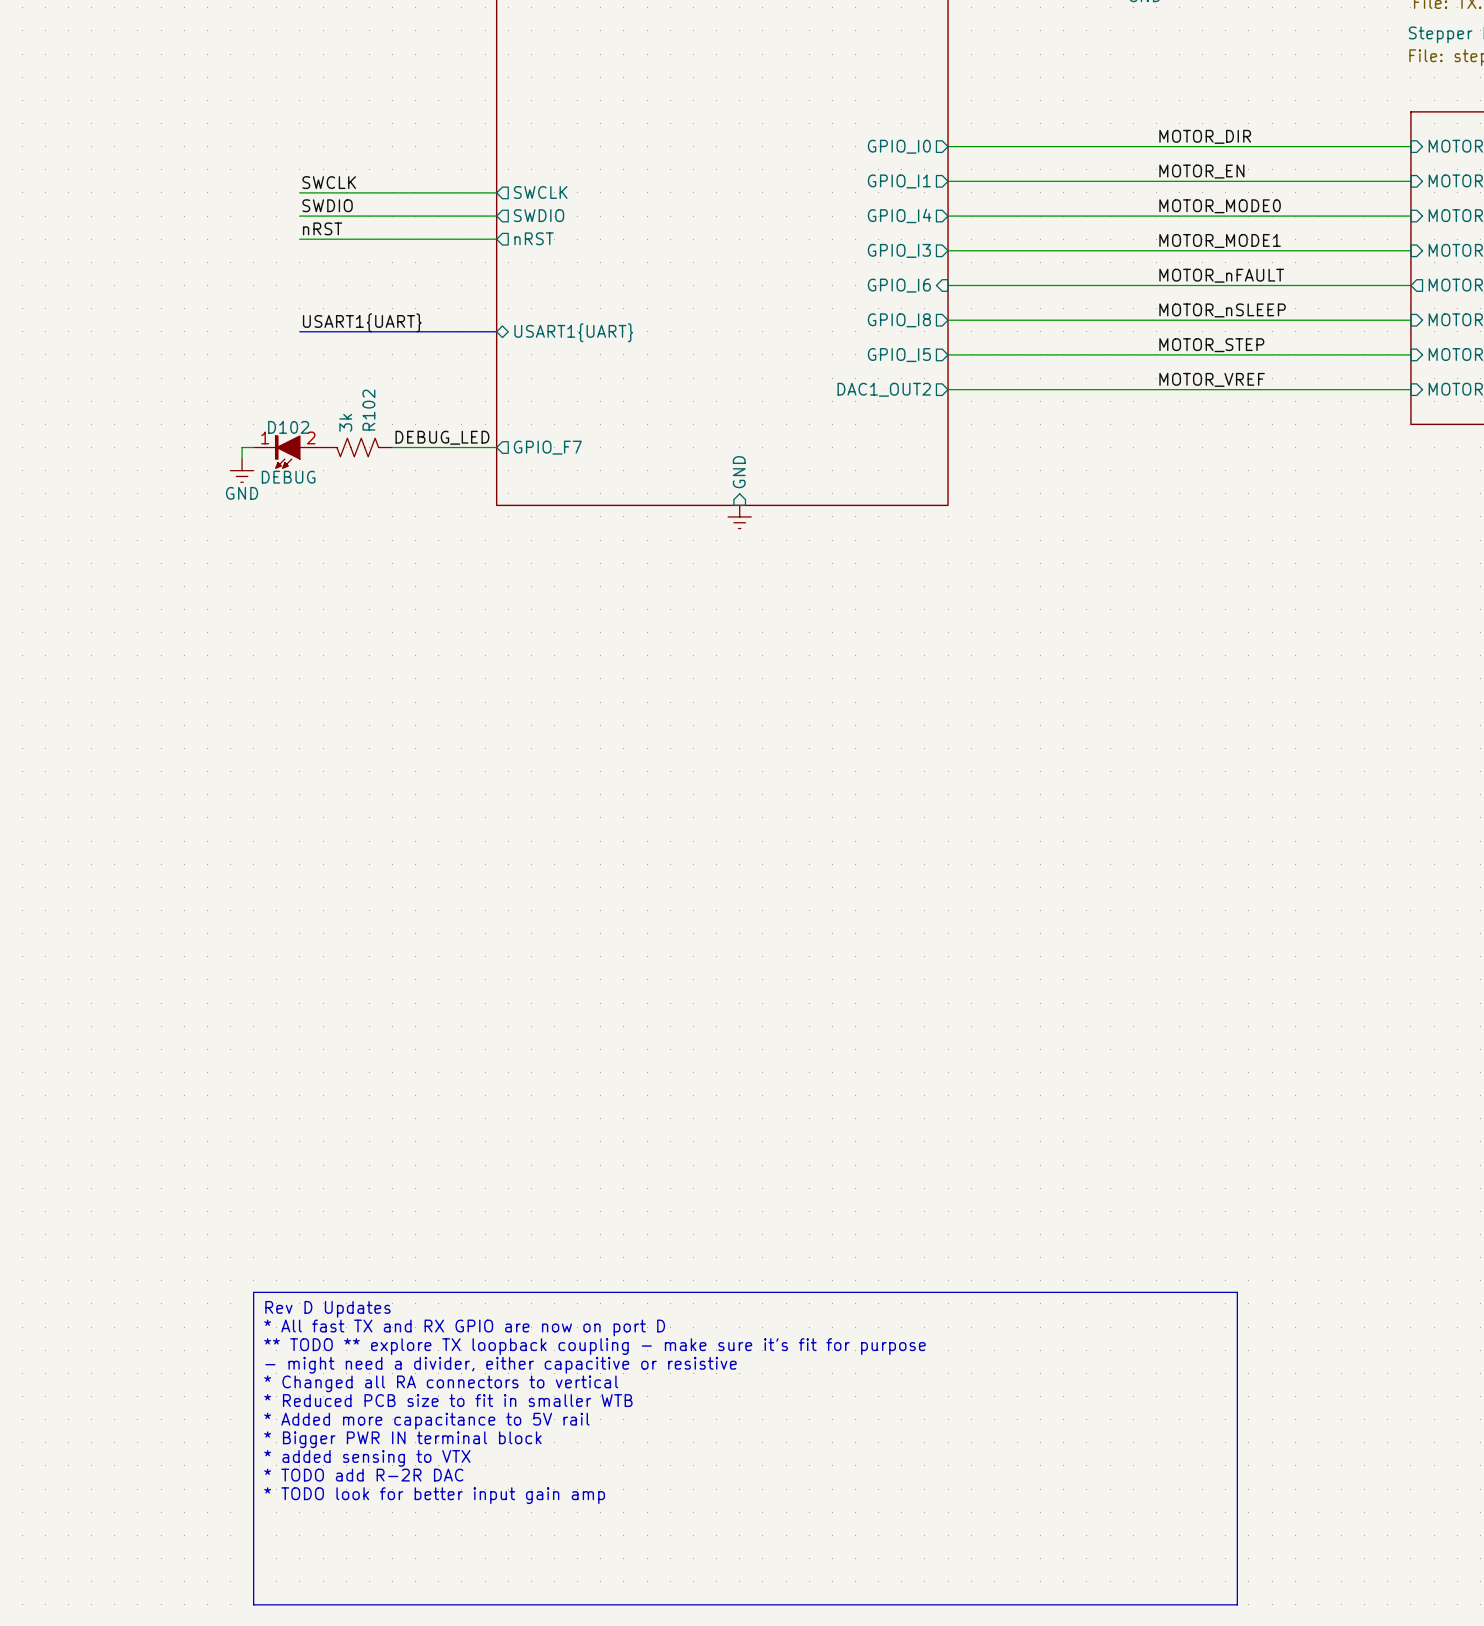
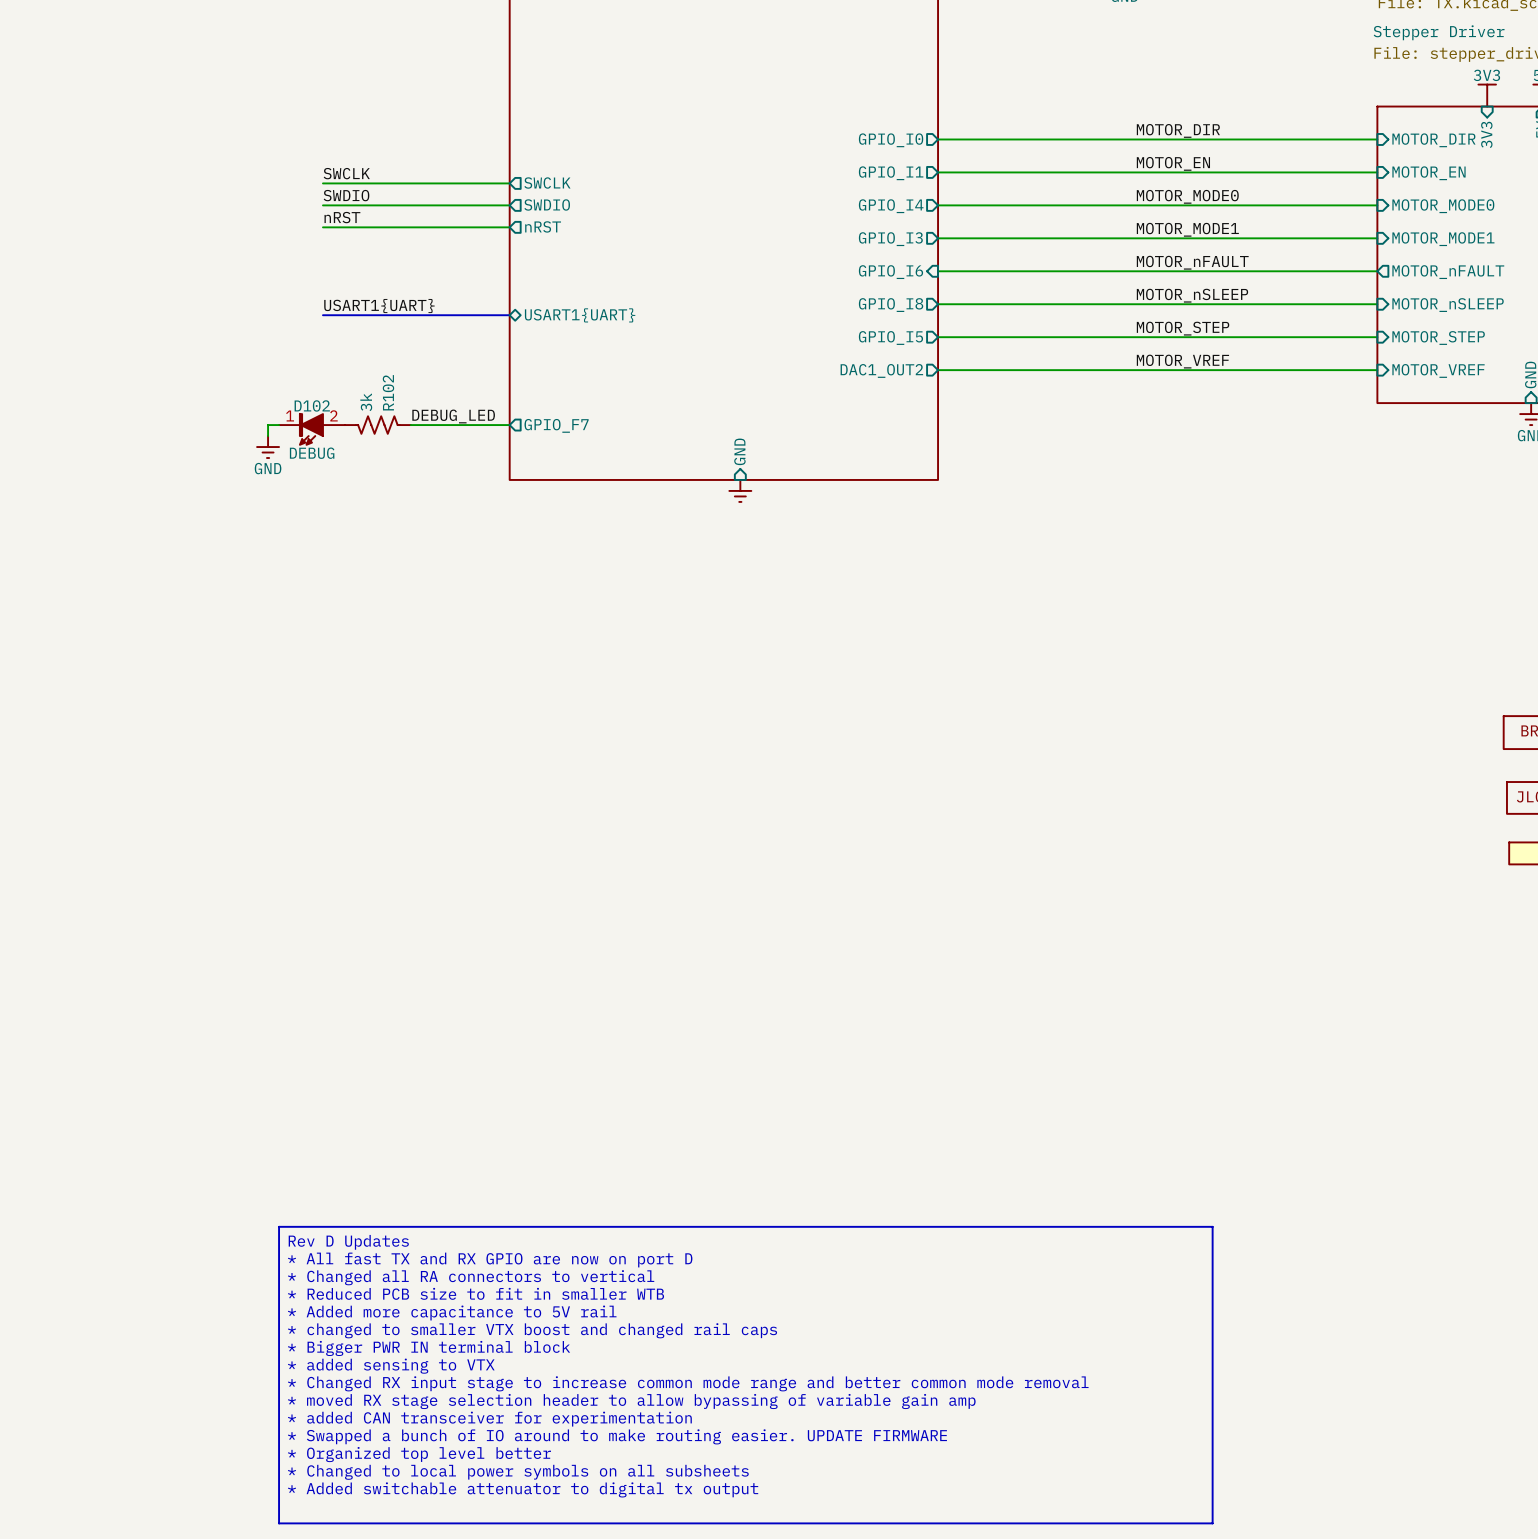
text: ** TODO ** explore TX loopback coupling - make sure it's fit for purpose (594, 1346) -> * Changed all RA connectors to vertical (471, 1277)
text: - might need a divider, either capacitive or resistive (501, 1365) -> * Reduced PCB size to fit in smaller WTB (476, 1293)
text: * Changed all RA connectors to vertical (441, 1383) -> * Added more capacitance to 5V rail (452, 1313)
text: * Reduced PCB size to fit in smaller WTB (448, 1400) -> * changed to smaller VTX boost and changed rail caps (532, 1330)
text: * Added more capacitance to 5V rail (426, 1421) -> * Bigger PWR IN terminal block (429, 1348)
text: * Bigger PWR IN terminal block (402, 1439) -> * added sensing to VTX (391, 1366)
text: * added sensing to VTX (367, 1458) -> * Changed RX input stage to increase common mode range and better common mode removal (688, 1383)
text: * TODO add R-2R DAC (363, 1475) -> * moved RX stage selection header to allow bypassing of variable gain amp (631, 1401)
text: * TODO look for better input gain amp (434, 1495) -> * added CAN transceiver for experimentation (489, 1419)
text: none -> * Swapped a bunch of IO around to make routing easier. UPDATE FIRMWARE (617, 1436)
text: none -> * Organized top level better (419, 1454)
text: none -> * Changed to local power symbols on all subsheets (518, 1472)
text: none -> * Added switchable attenuator to digital tx output (523, 1489)

